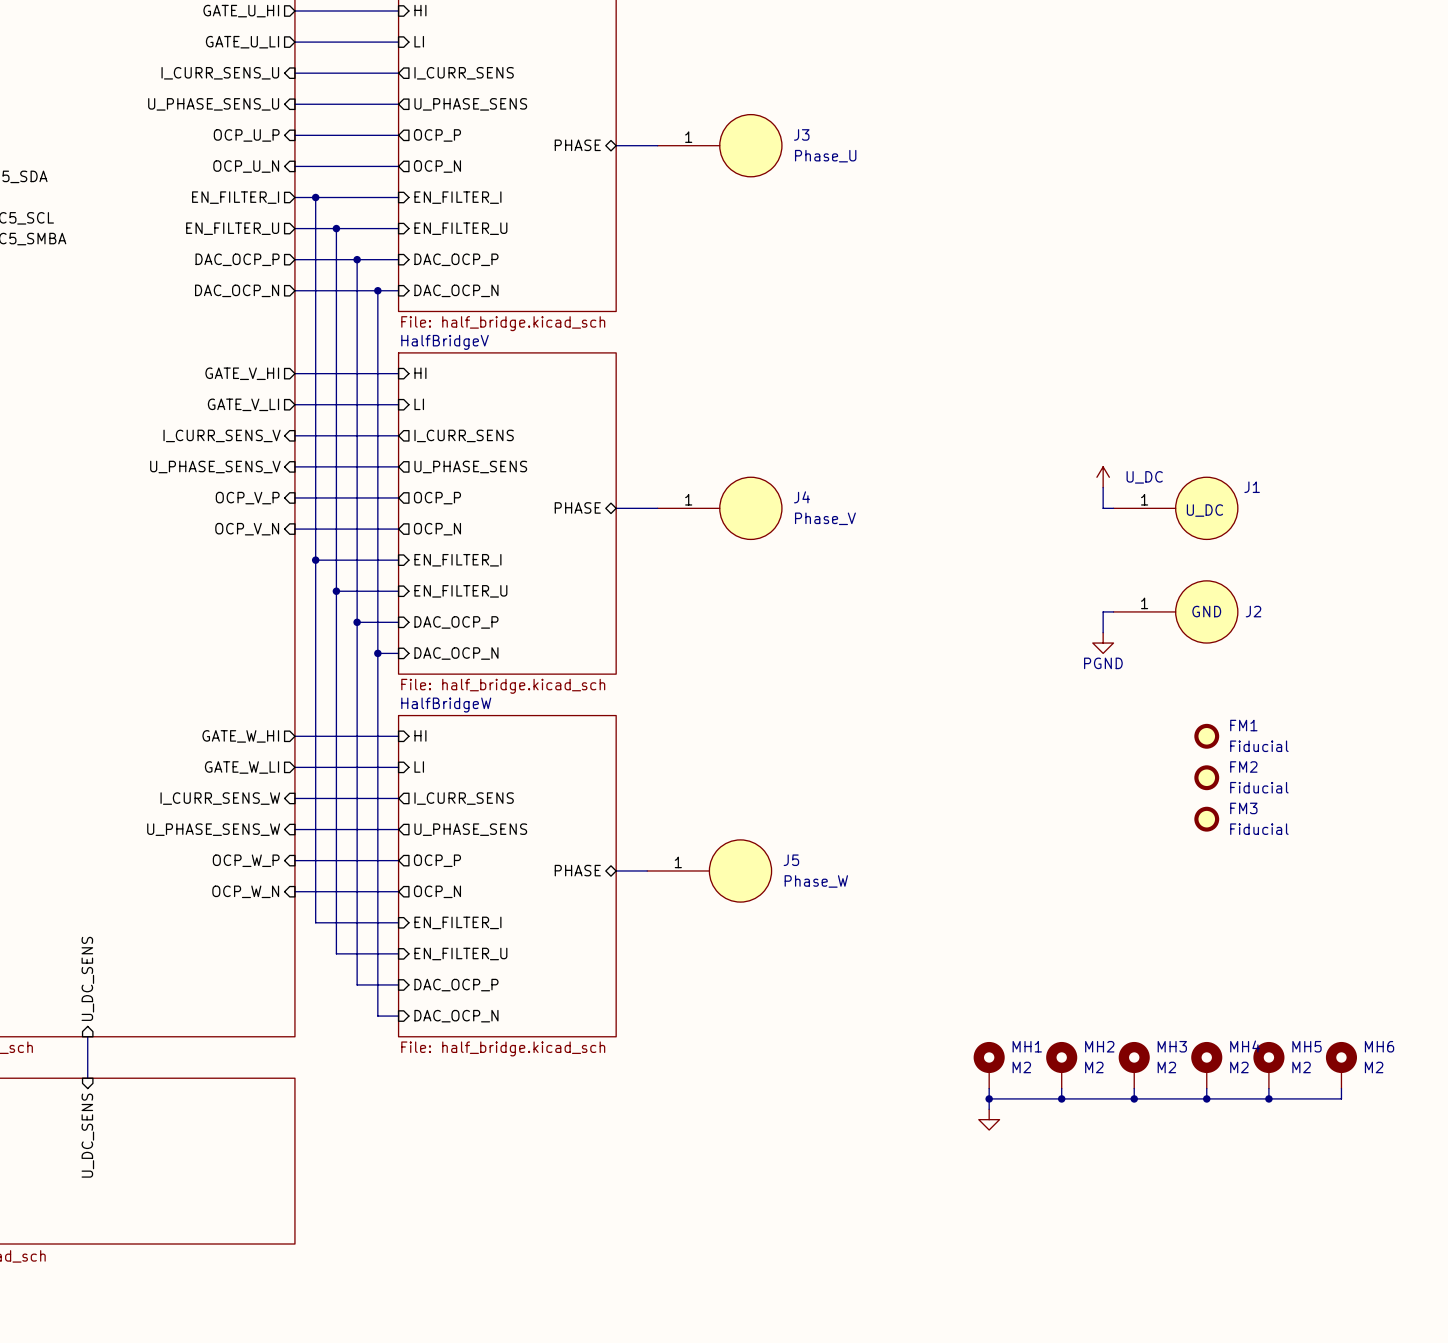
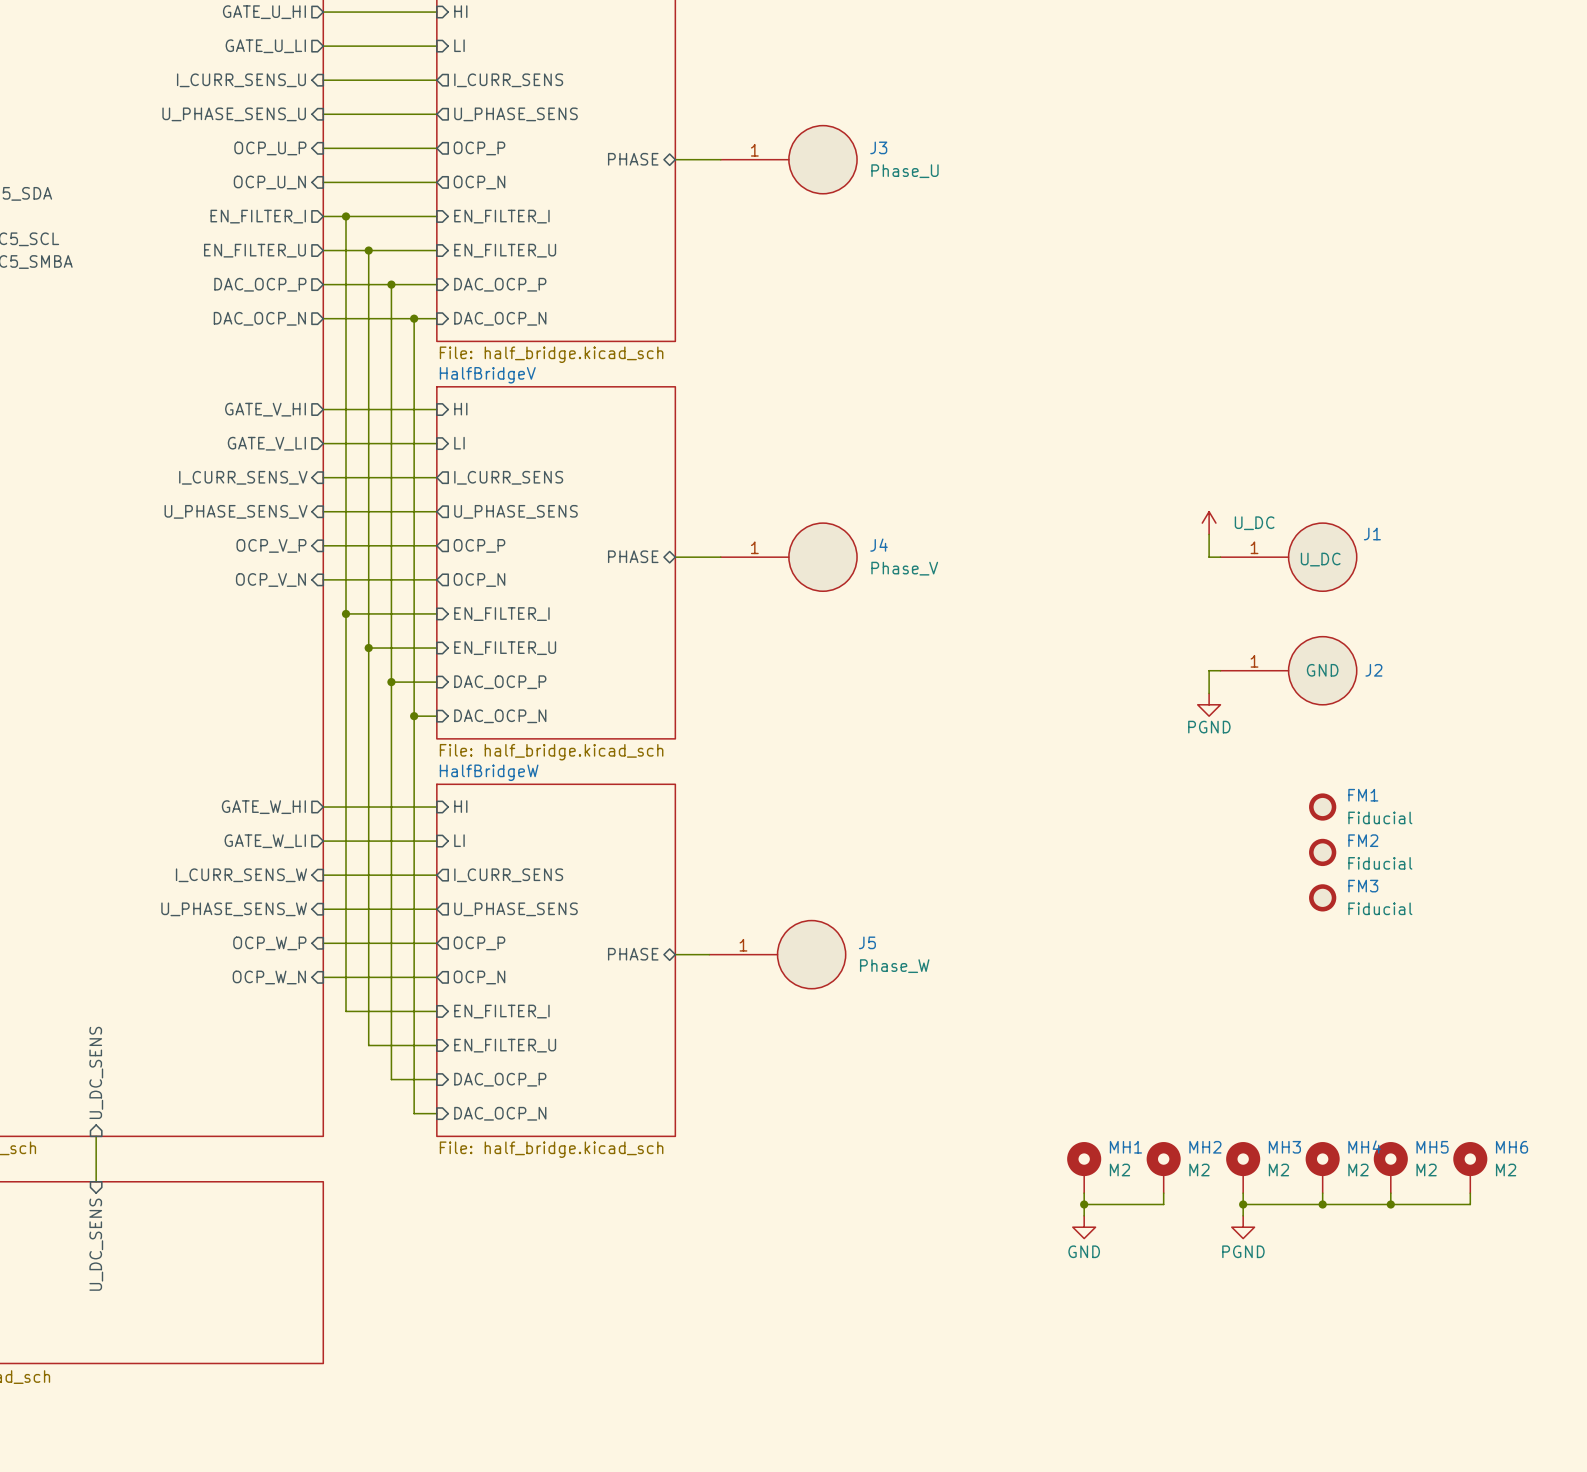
wire: (1061, 1098) (1134, 1098) -> (1243, 1215) (1243, 1204)
junction: (1061, 1098) -> none
power symbol: none -> PGND (1243, 1227)
power symbol text: none -> GND (1084, 1251)

